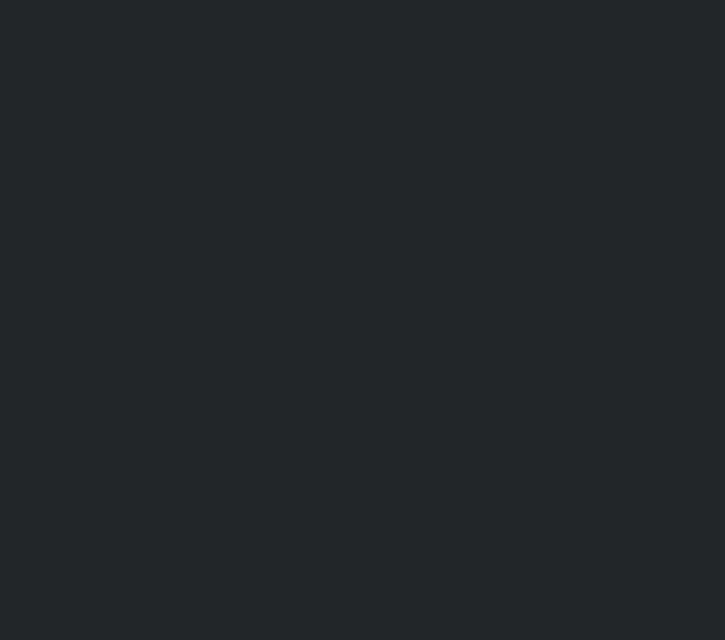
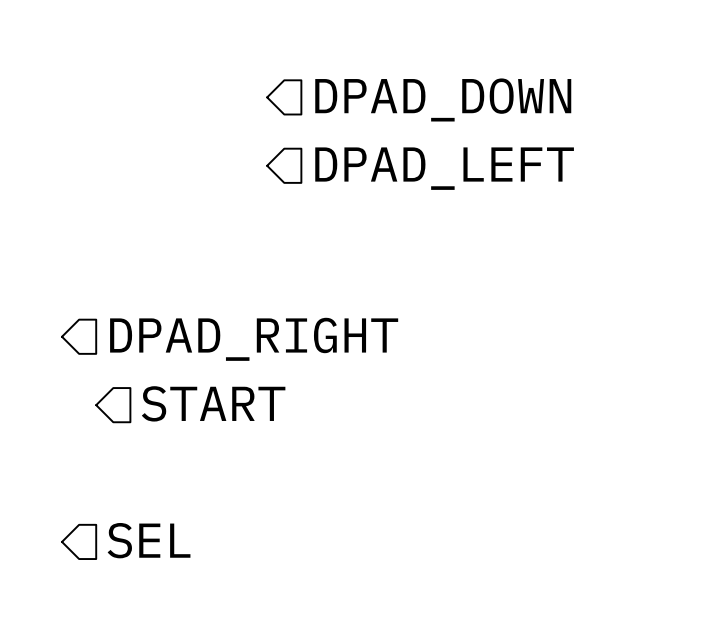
hierarchical label: none -> DPAD_DOWN (443, 99)
hierarchical label: none -> DPAD_LEFT (444, 168)
hierarchical label: none -> DPAD_RIGHT (254, 339)
hierarchical label: none -> START (213, 403)
hierarchical label: none -> SEL (149, 540)

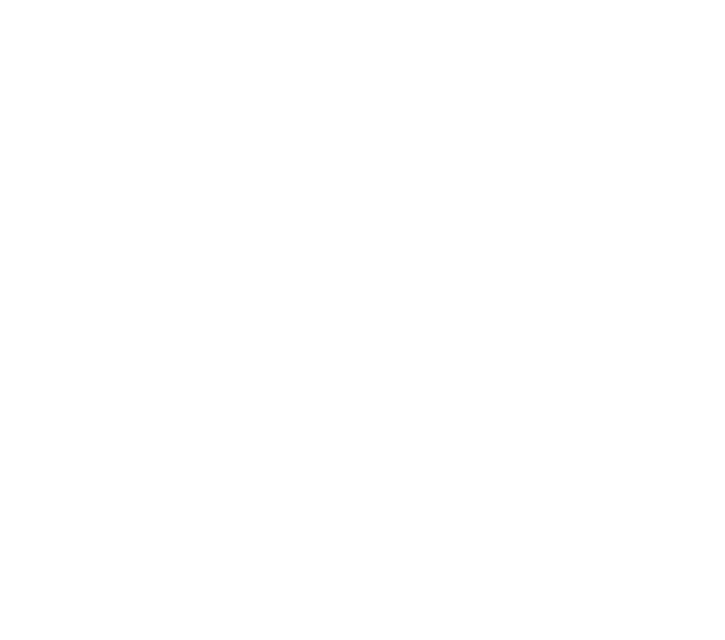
hierarchical label: DPAD_DOWN (443, 99) -> none
hierarchical label: DPAD_LEFT (444, 168) -> none
hierarchical label: DPAD_RIGHT (254, 339) -> none
hierarchical label: START (213, 403) -> none
hierarchical label: SEL (149, 540) -> none

